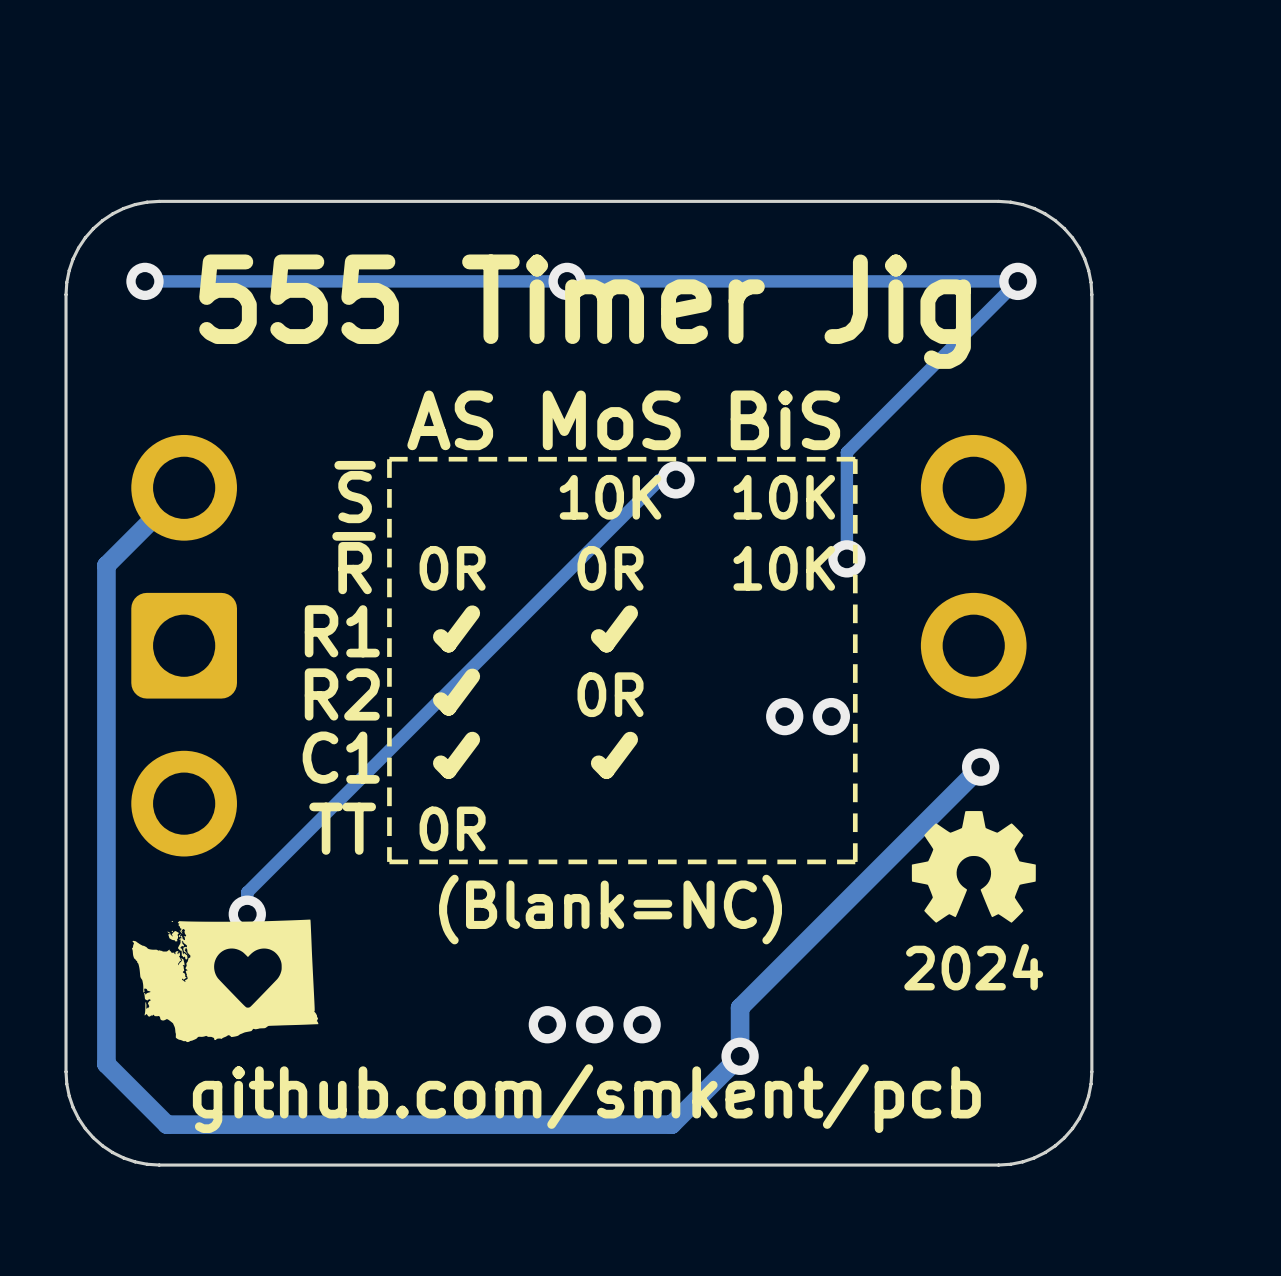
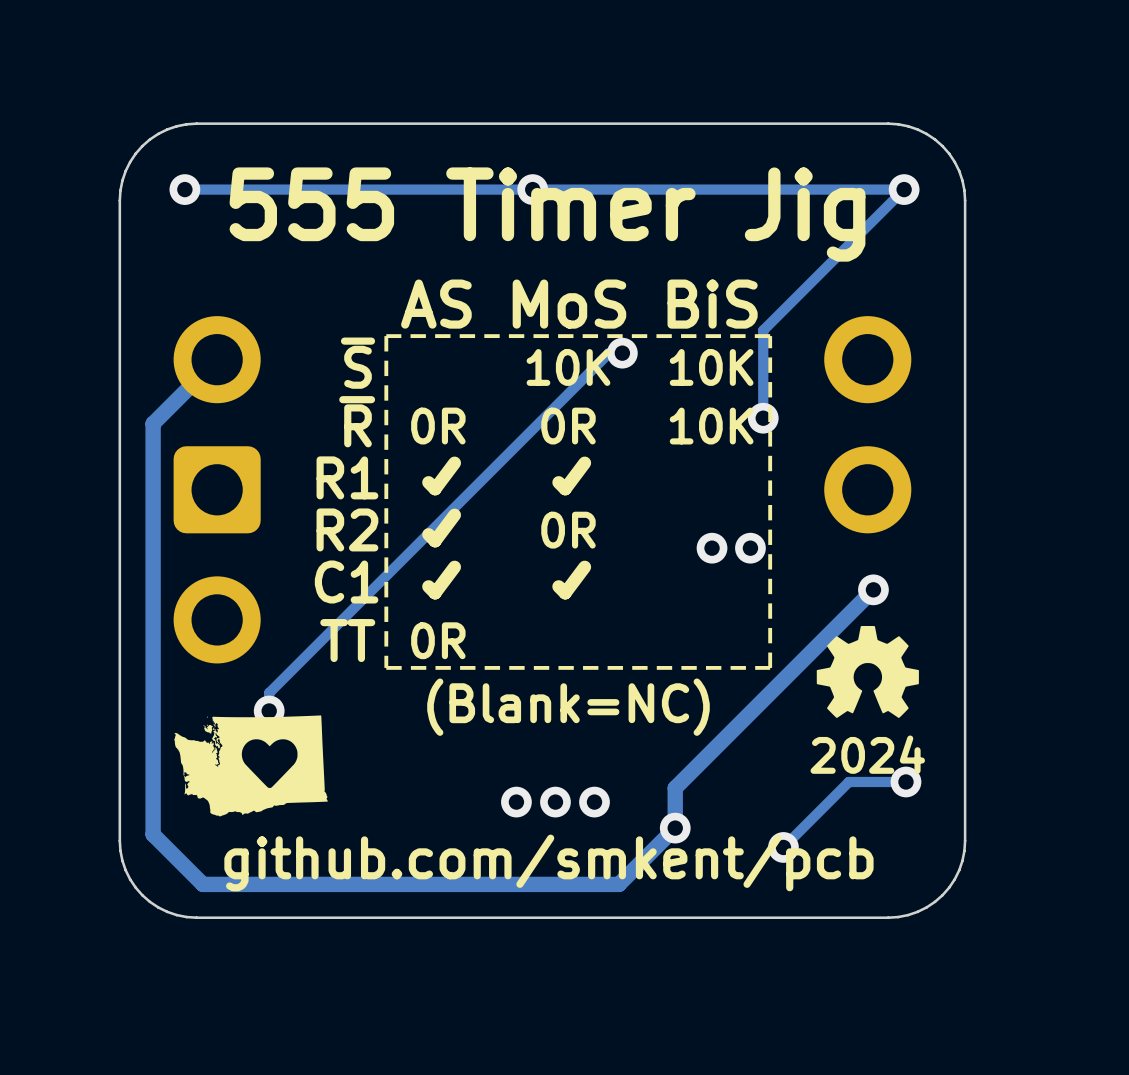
track: none -> (905, 781) (848, 781) (783, 847)
via: none -> (905, 781)
via: none -> (783, 847)

